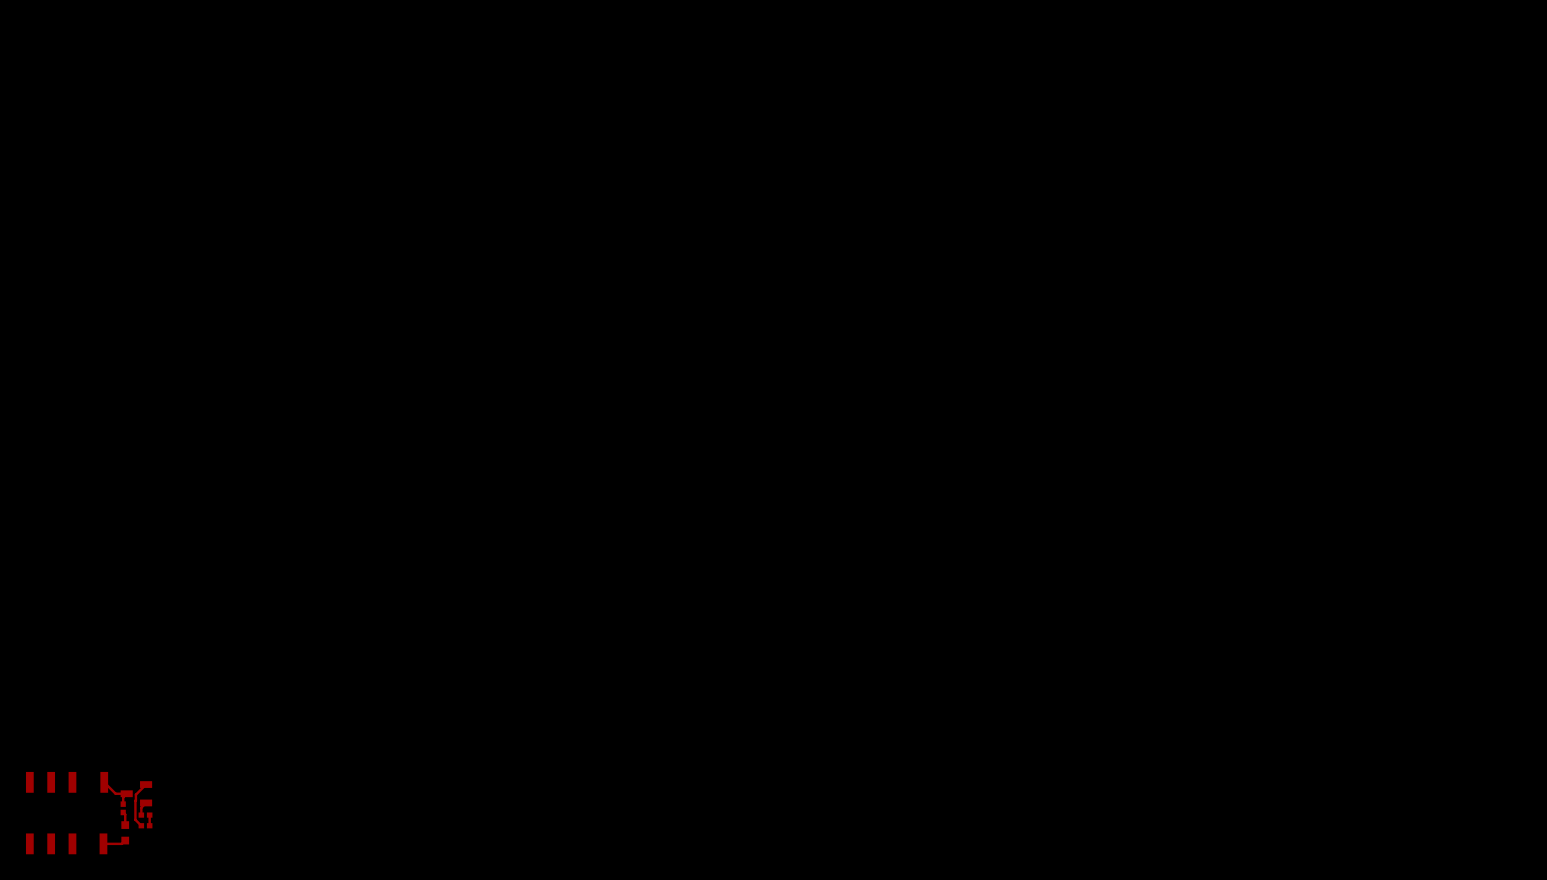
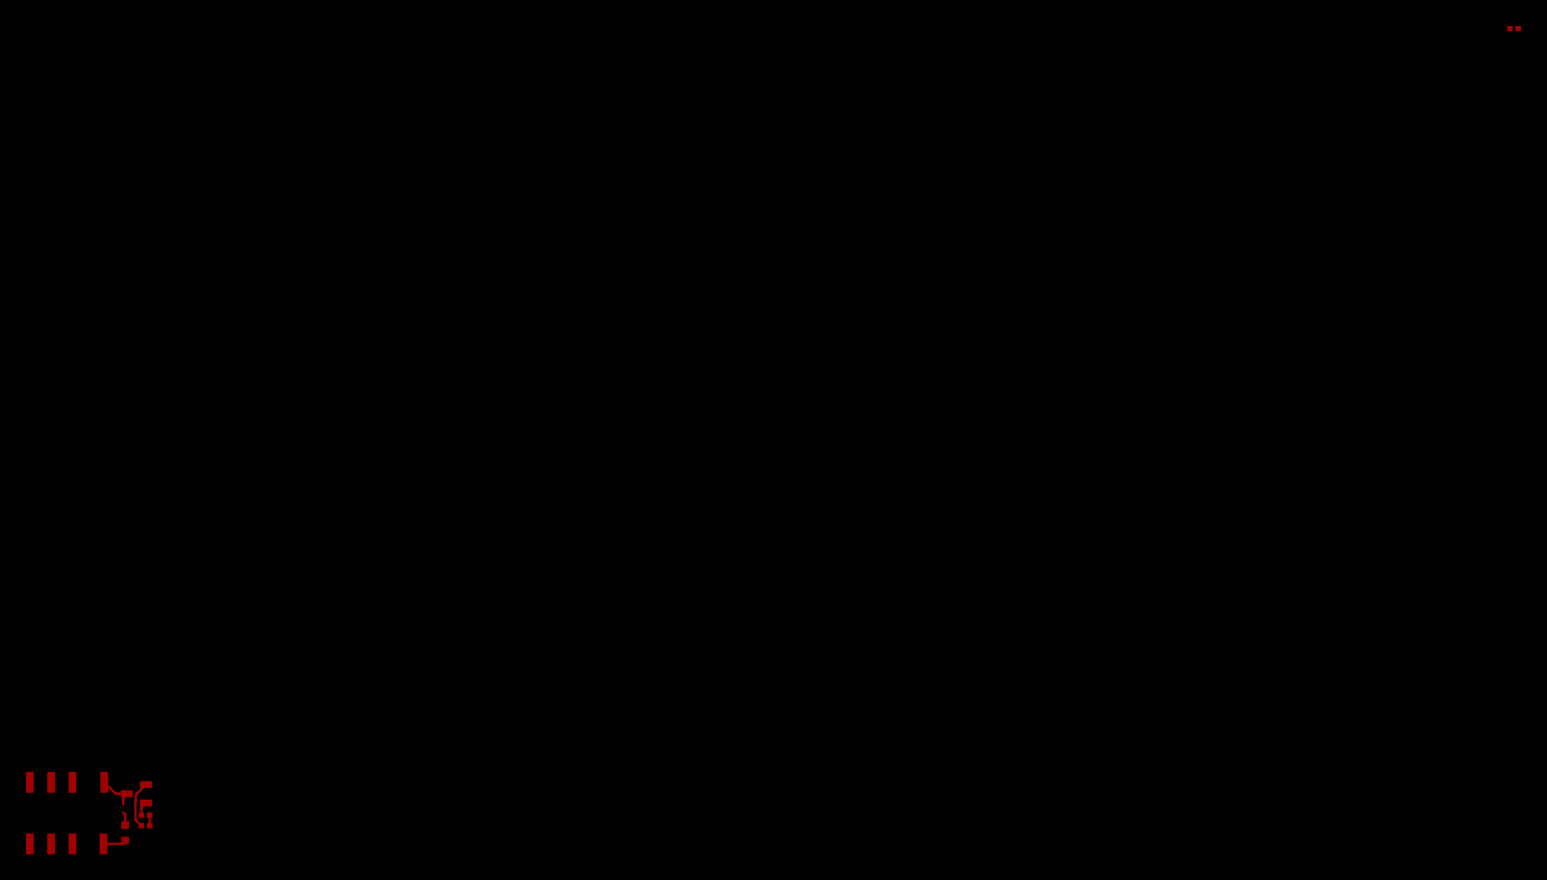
part: none -> (1514, 28)
part: (123, 808) -> none

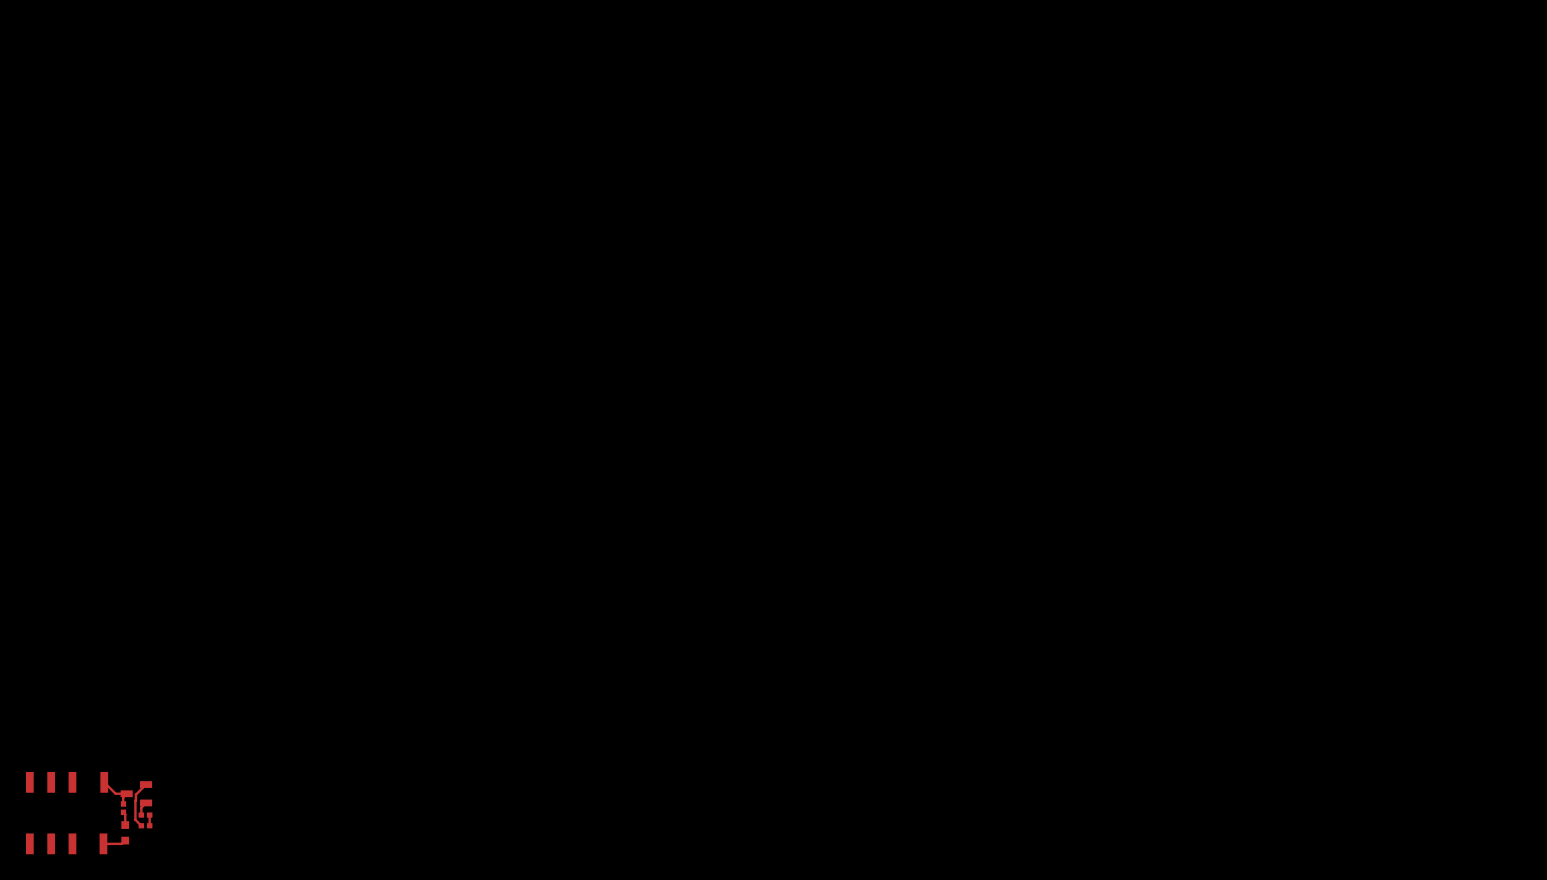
part: (1514, 28) -> none
part: none -> (123, 808)

